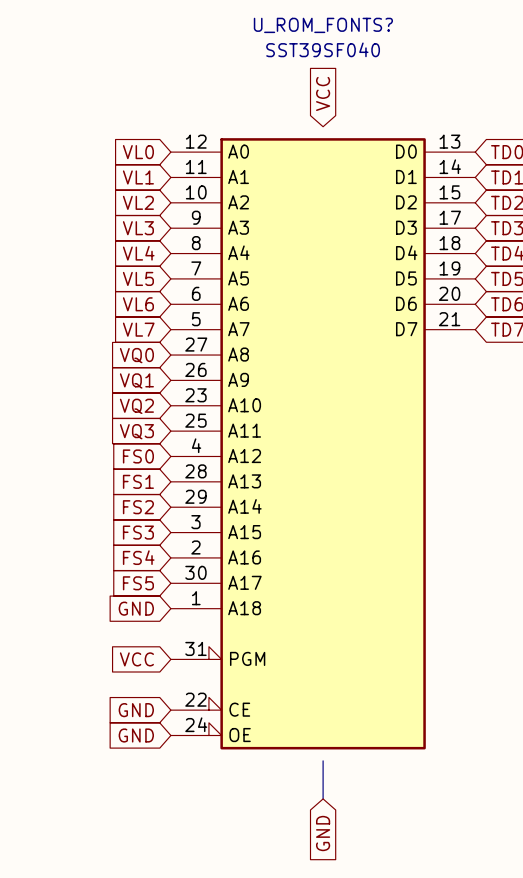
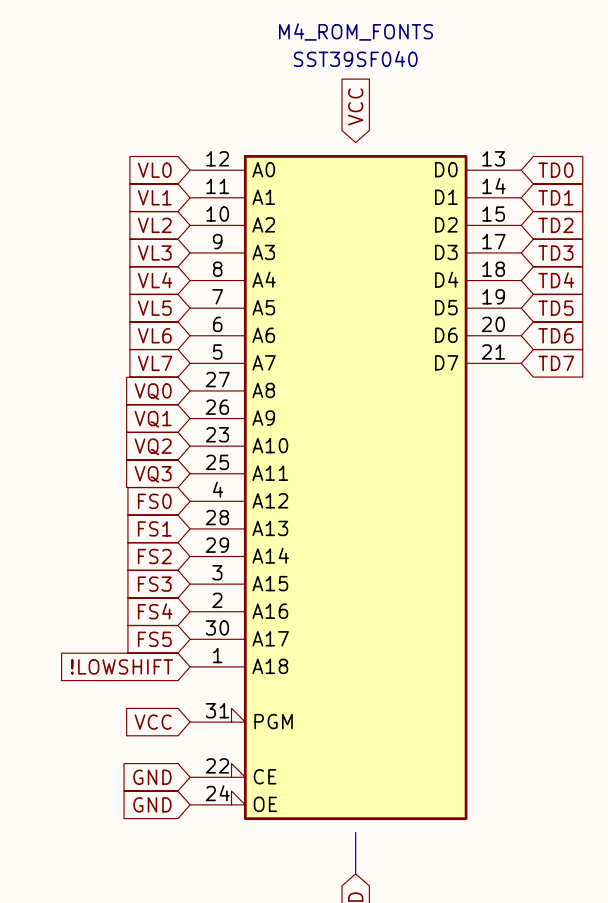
U_ROM_FONTS? name: U_ROM_FONTS? (323, 25) -> M4_ROM_FONTS (356, 32)
global label: GND (136, 608) -> !LOWSHIFT (121, 666)

